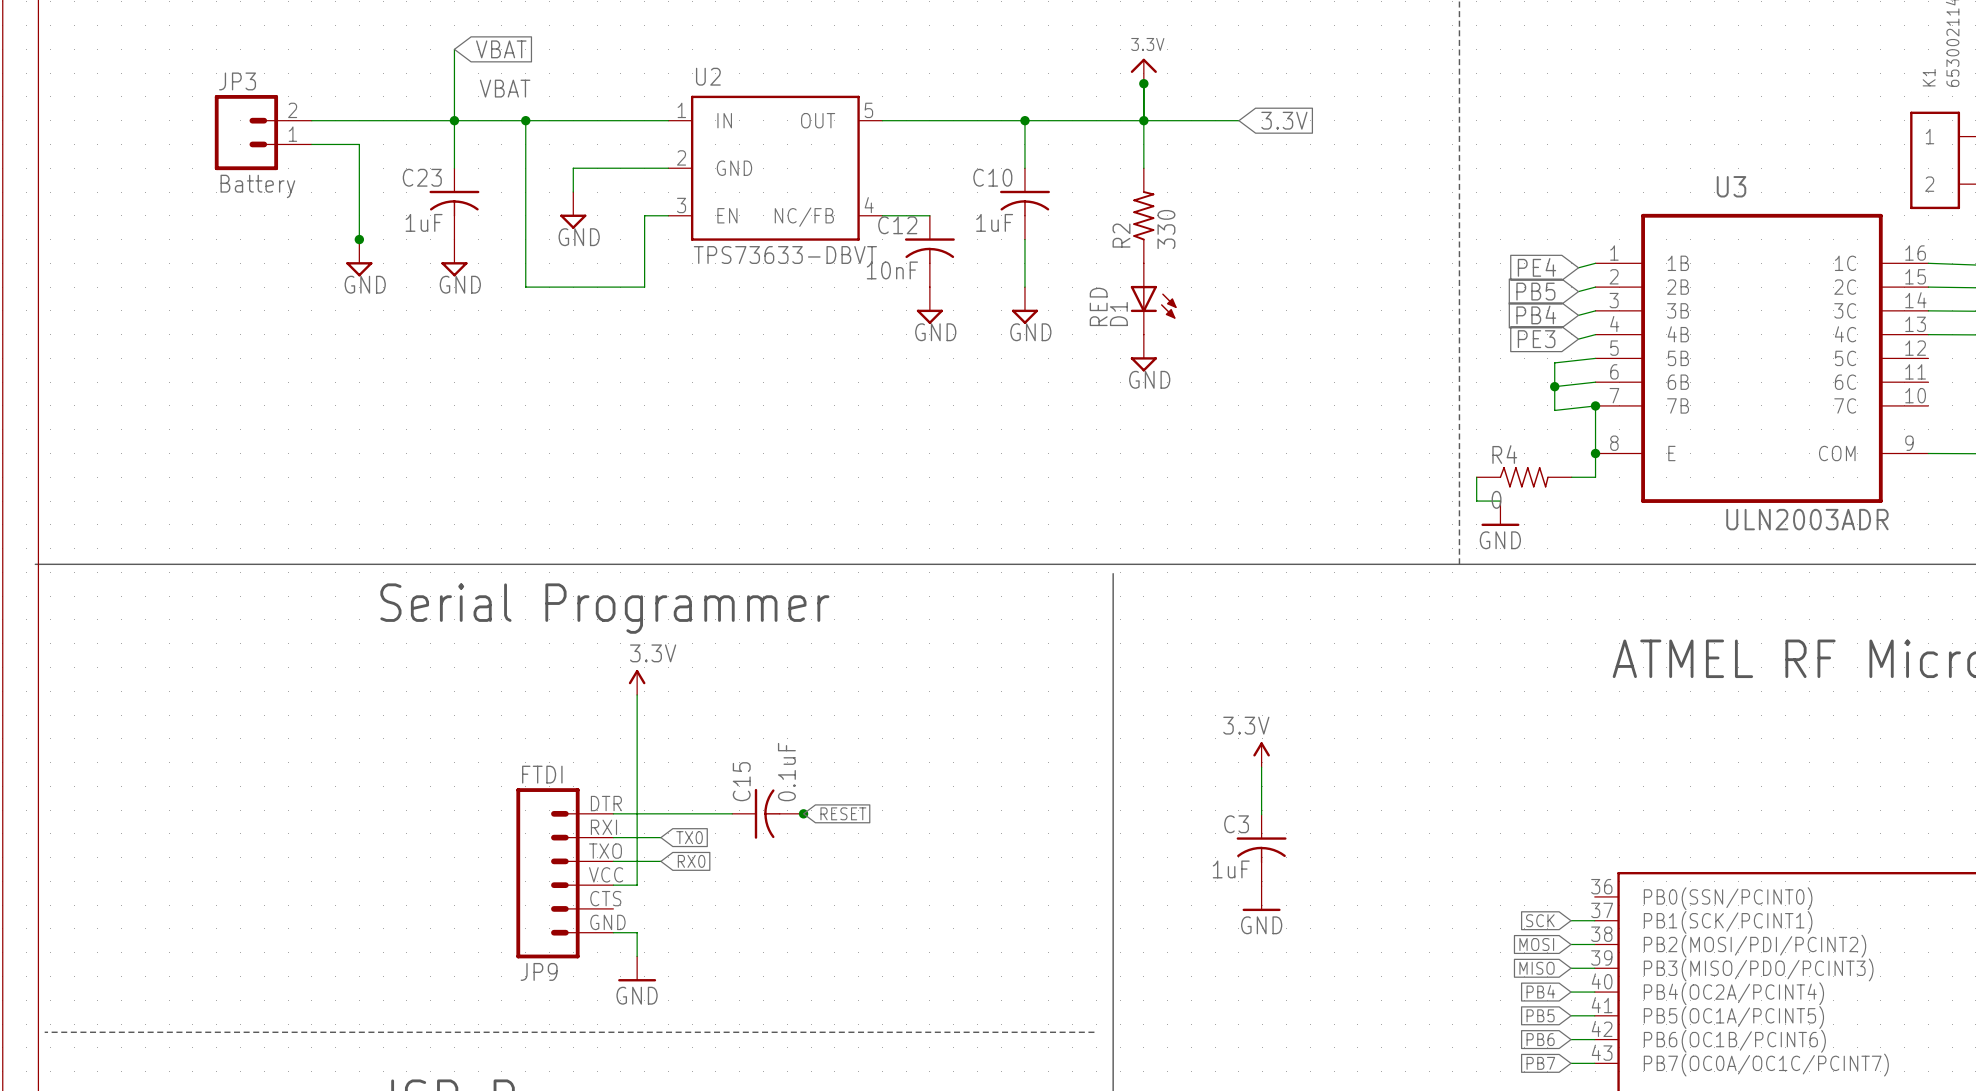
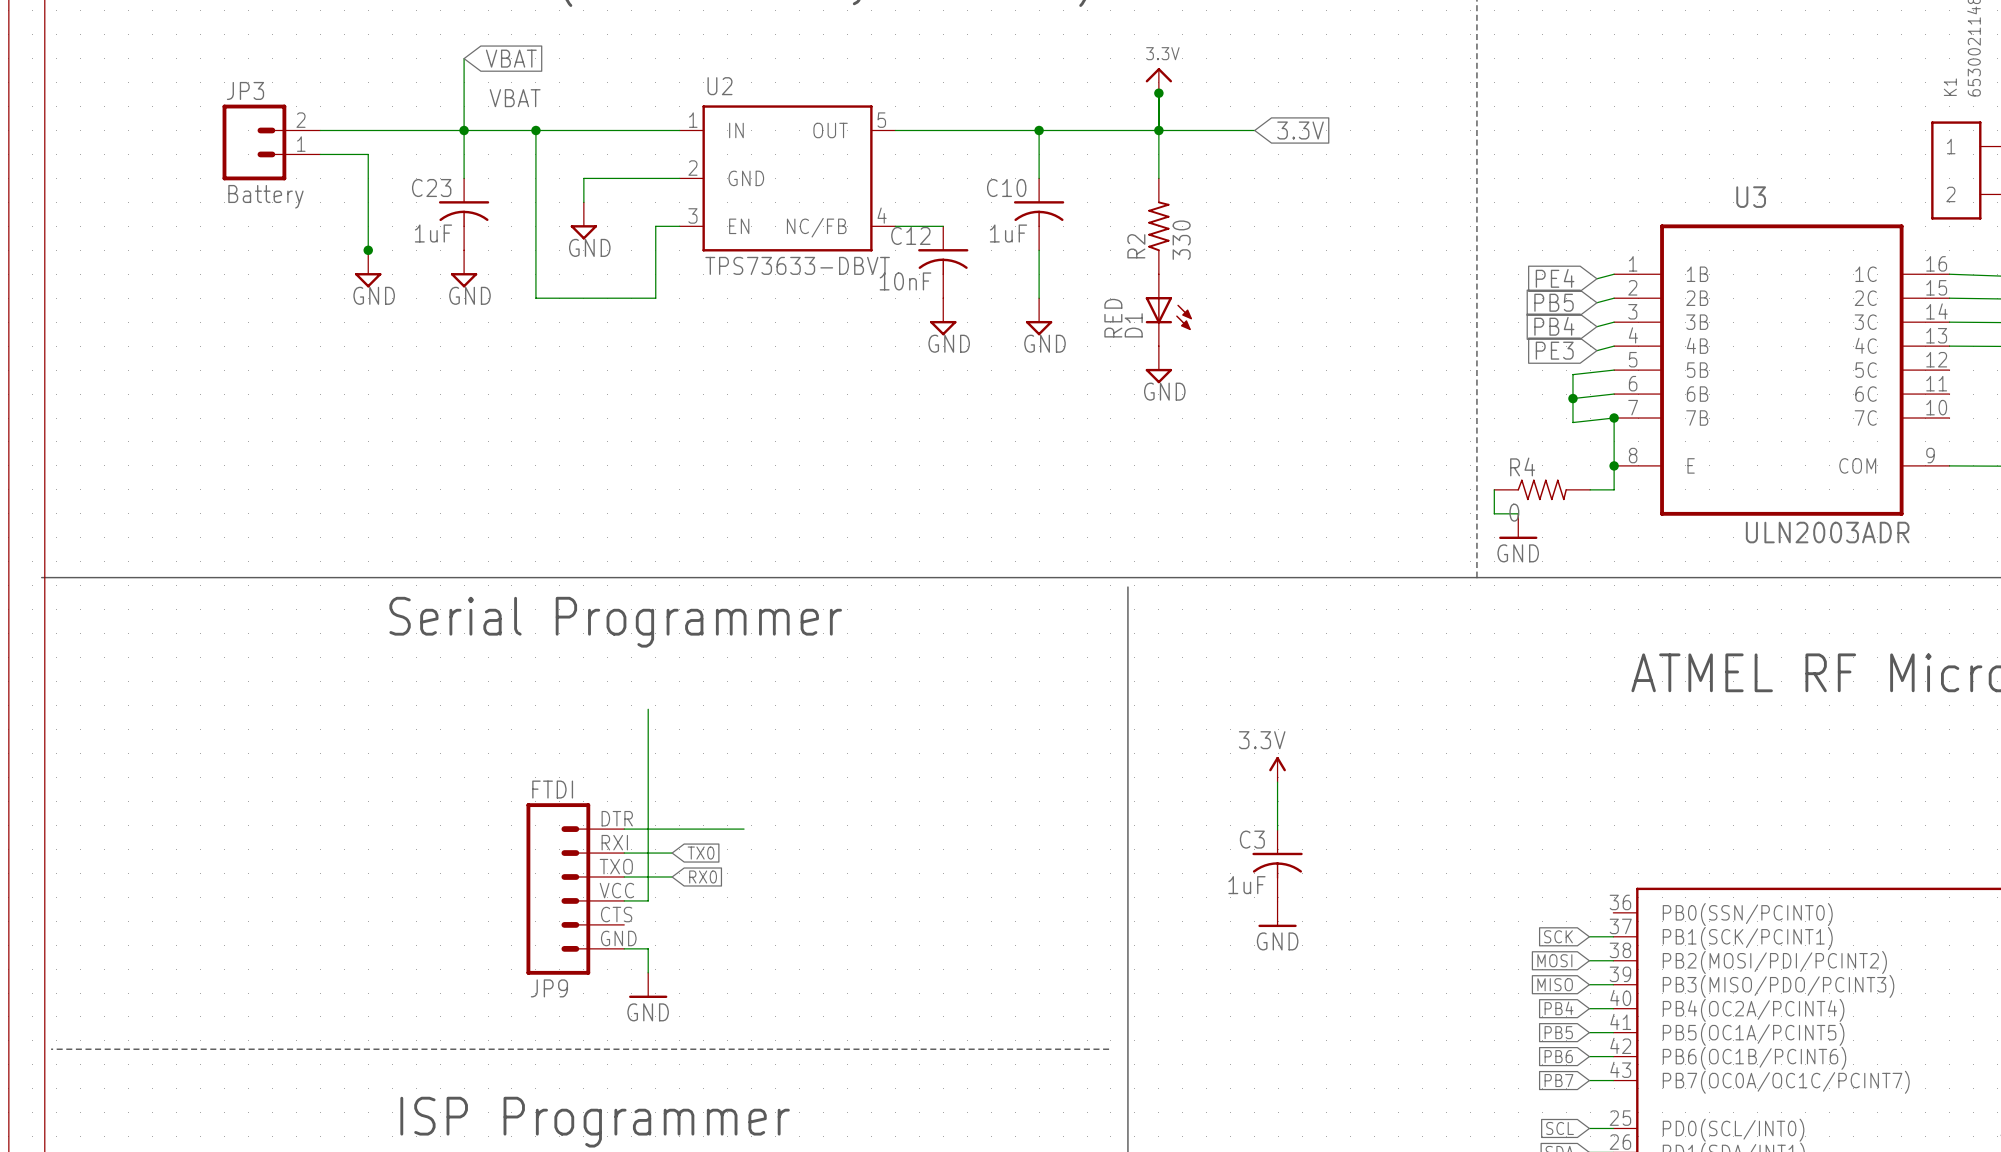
power symbol: 3.3V (637, 682) -> none
C15: 0.1uF (767, 813) -> none
junction: (803, 813) -> none
global label: RESET (843, 813) -> none

